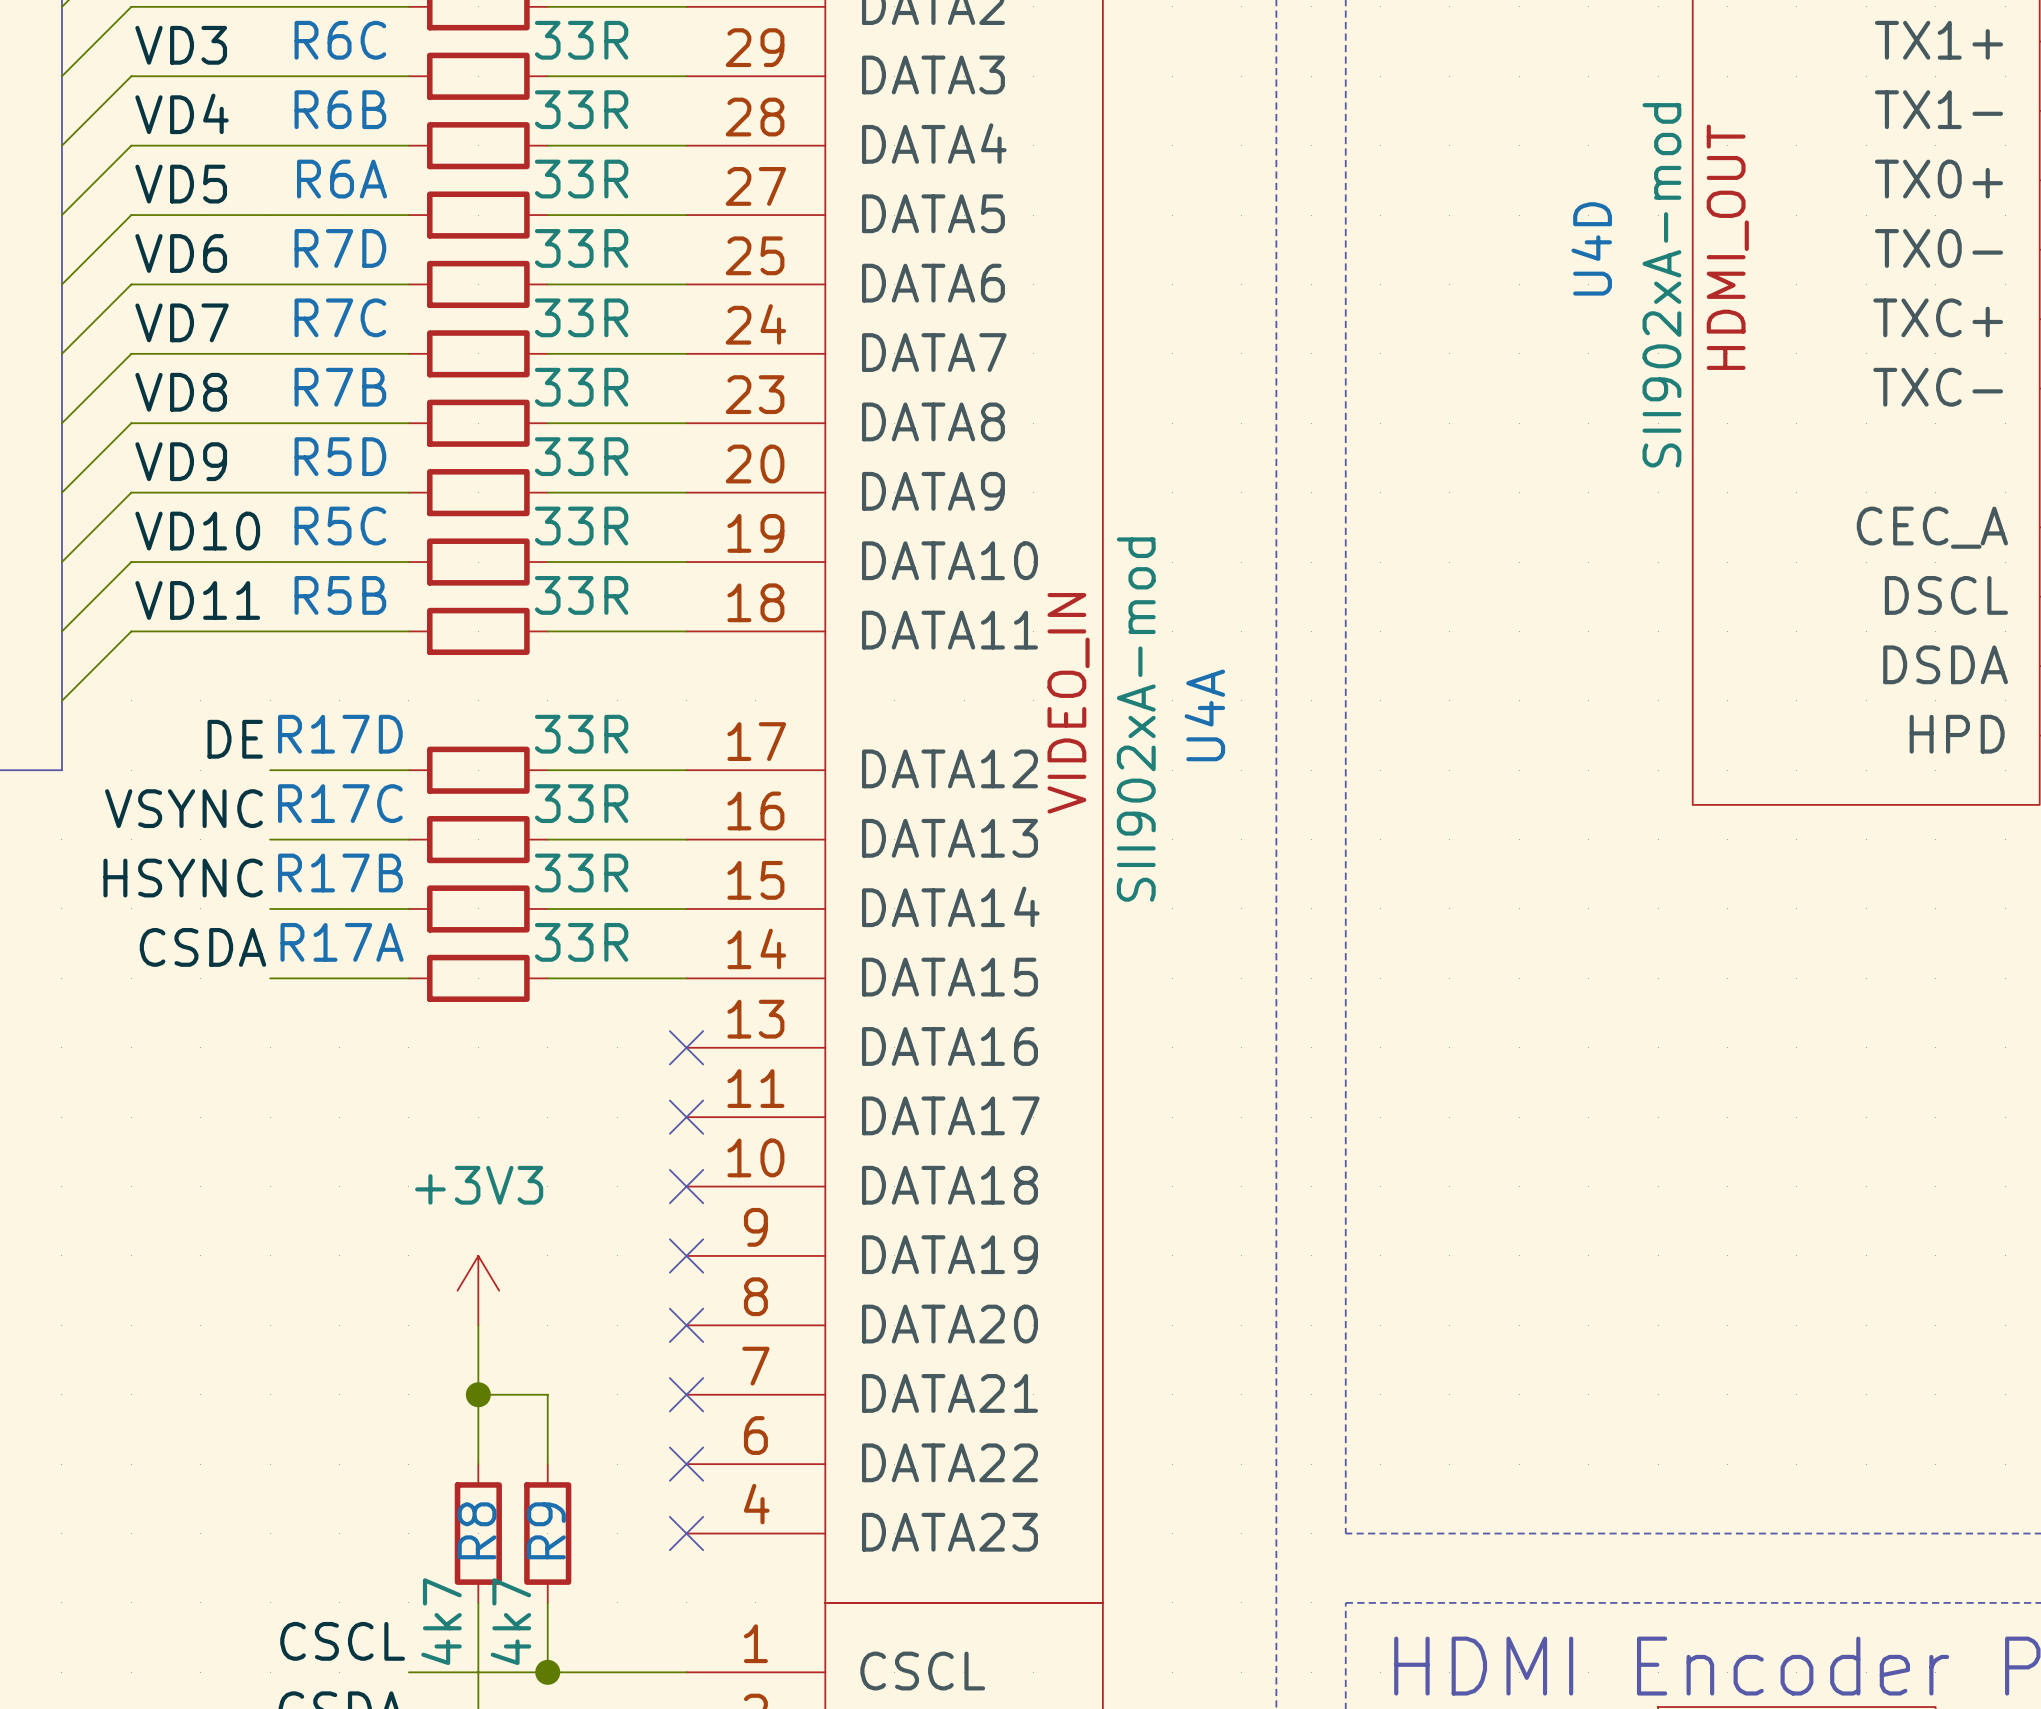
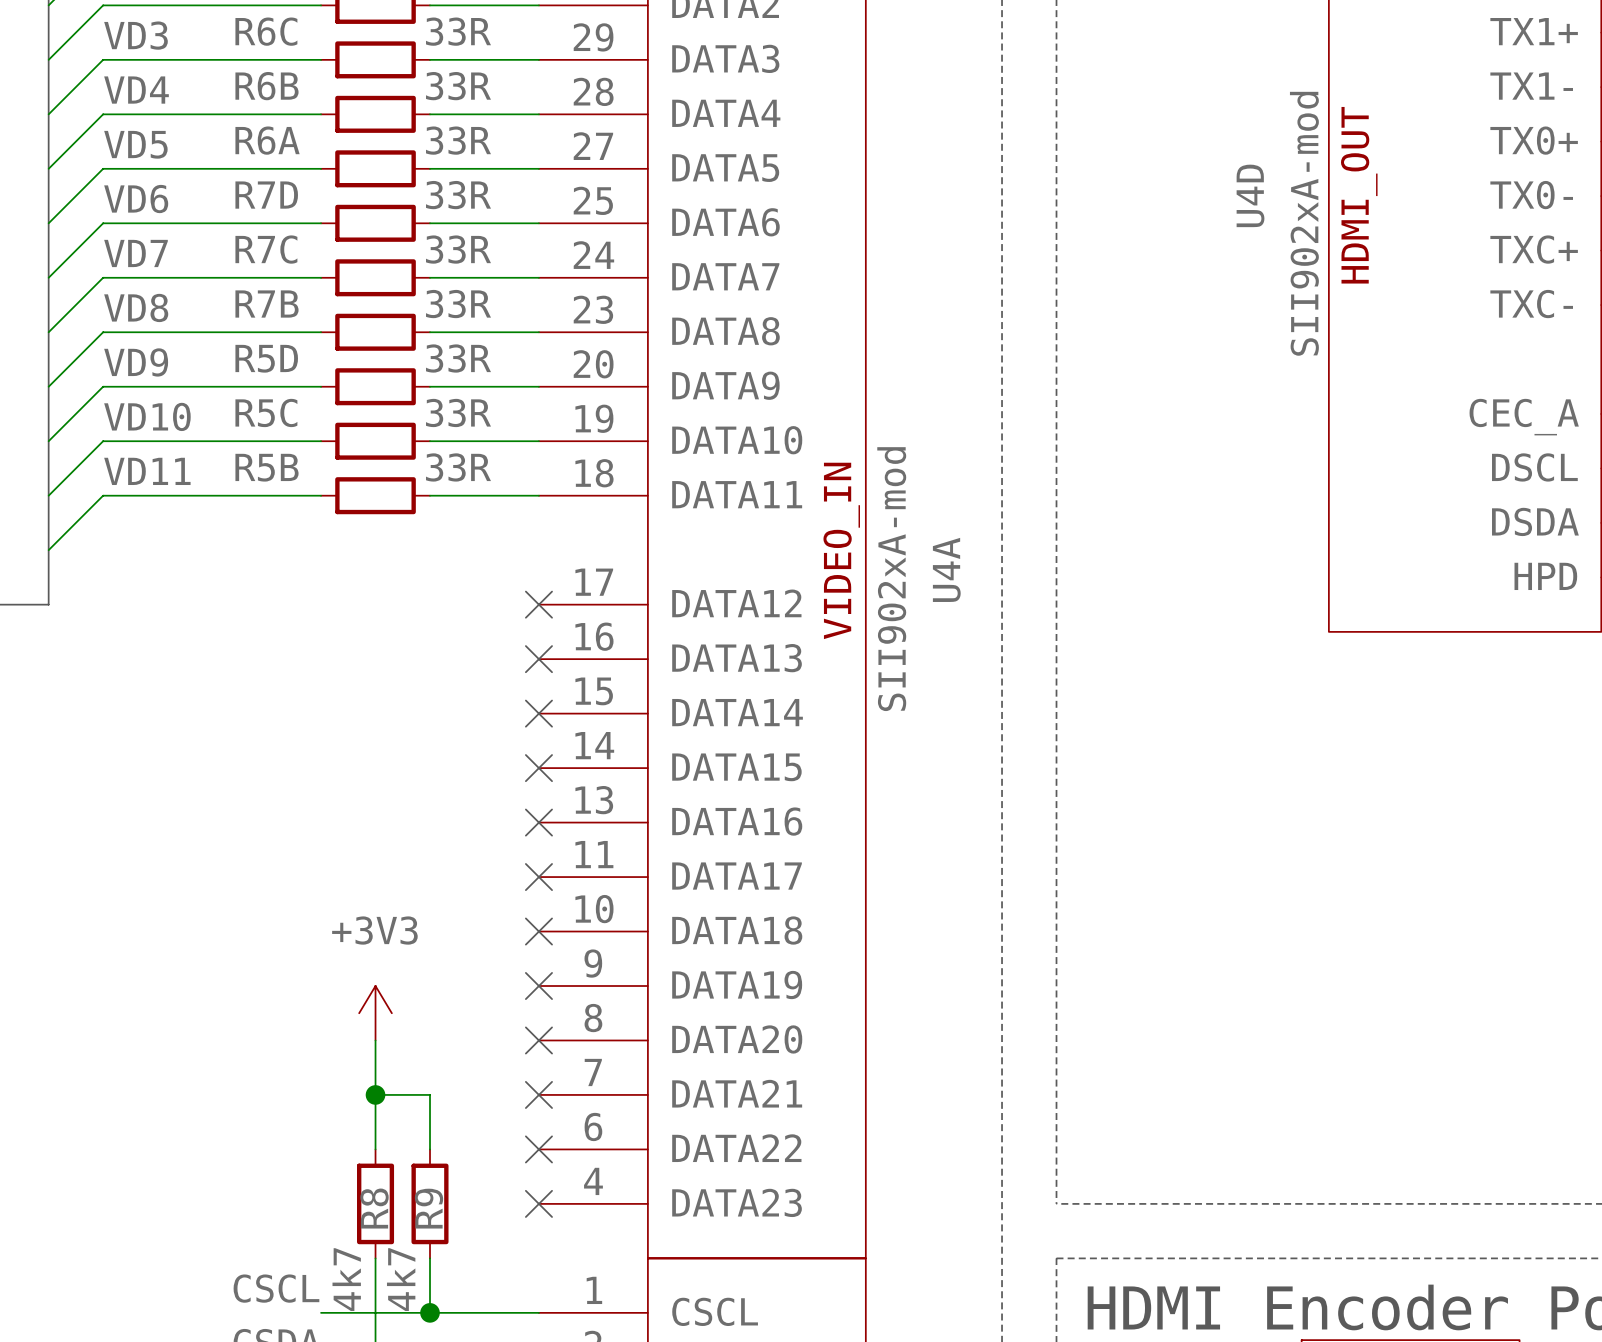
label: DE (235, 739) -> none
wire: (270, 770) (408, 770) -> none
R17D: 33R (478, 770) -> none
wire: (547, 770) (686, 770) -> none
no-connect mark: none -> (538, 604)
label: VSYNC (183, 808) -> none
wire: (270, 839) (408, 839) -> none
R17C: 33R (478, 839) -> none
wire: (547, 839) (686, 839) -> none
no-connect mark: none -> (538, 659)
label: HSYNC (183, 878) -> none
wire: (270, 908) (408, 908) -> none
R17B: 33R (478, 908) -> none
wire: (547, 908) (686, 908) -> none
no-connect mark: none -> (538, 713)
label: CSDA (202, 947) -> none
wire: (270, 978) (408, 978) -> none
R17A: 33R (478, 978) -> none
wire: (547, 978) (686, 978) -> none
no-connect mark: none -> (538, 768)

